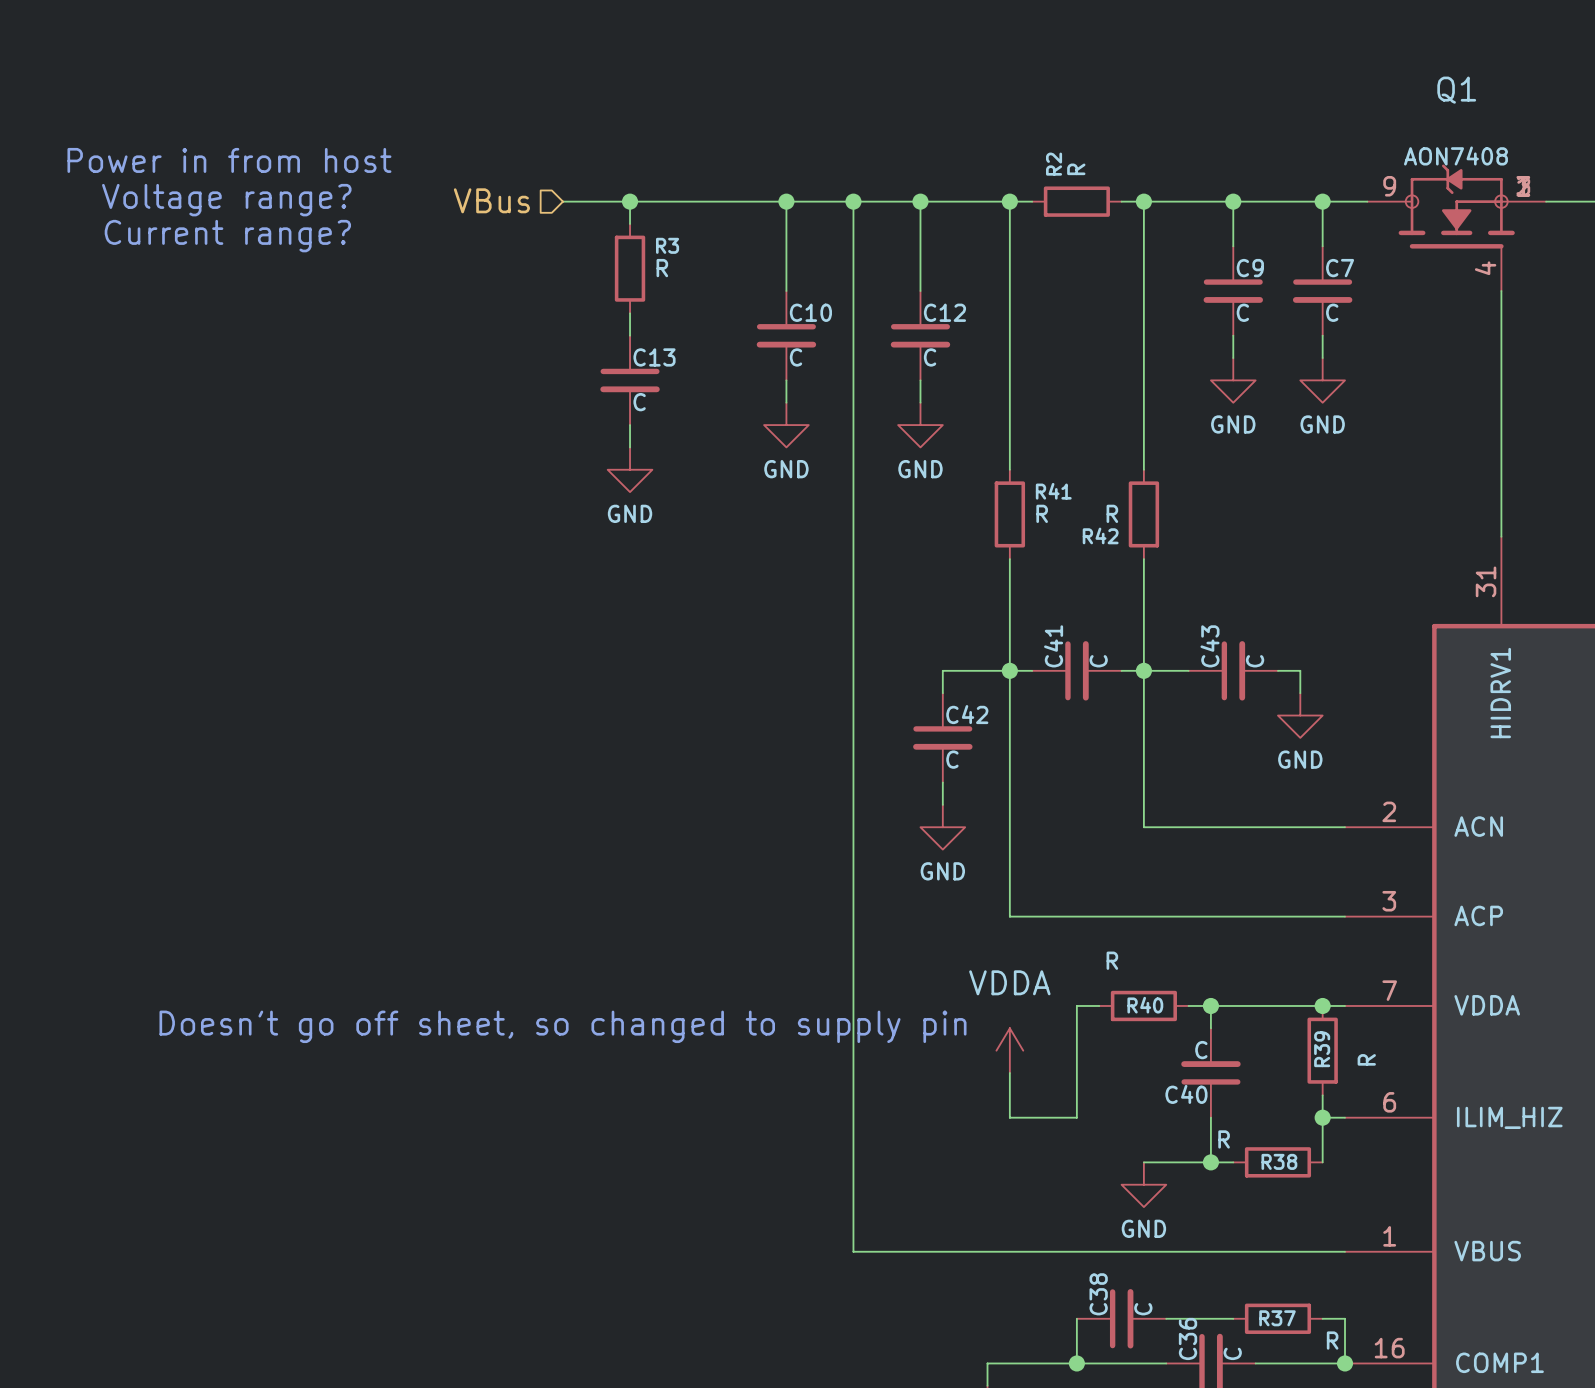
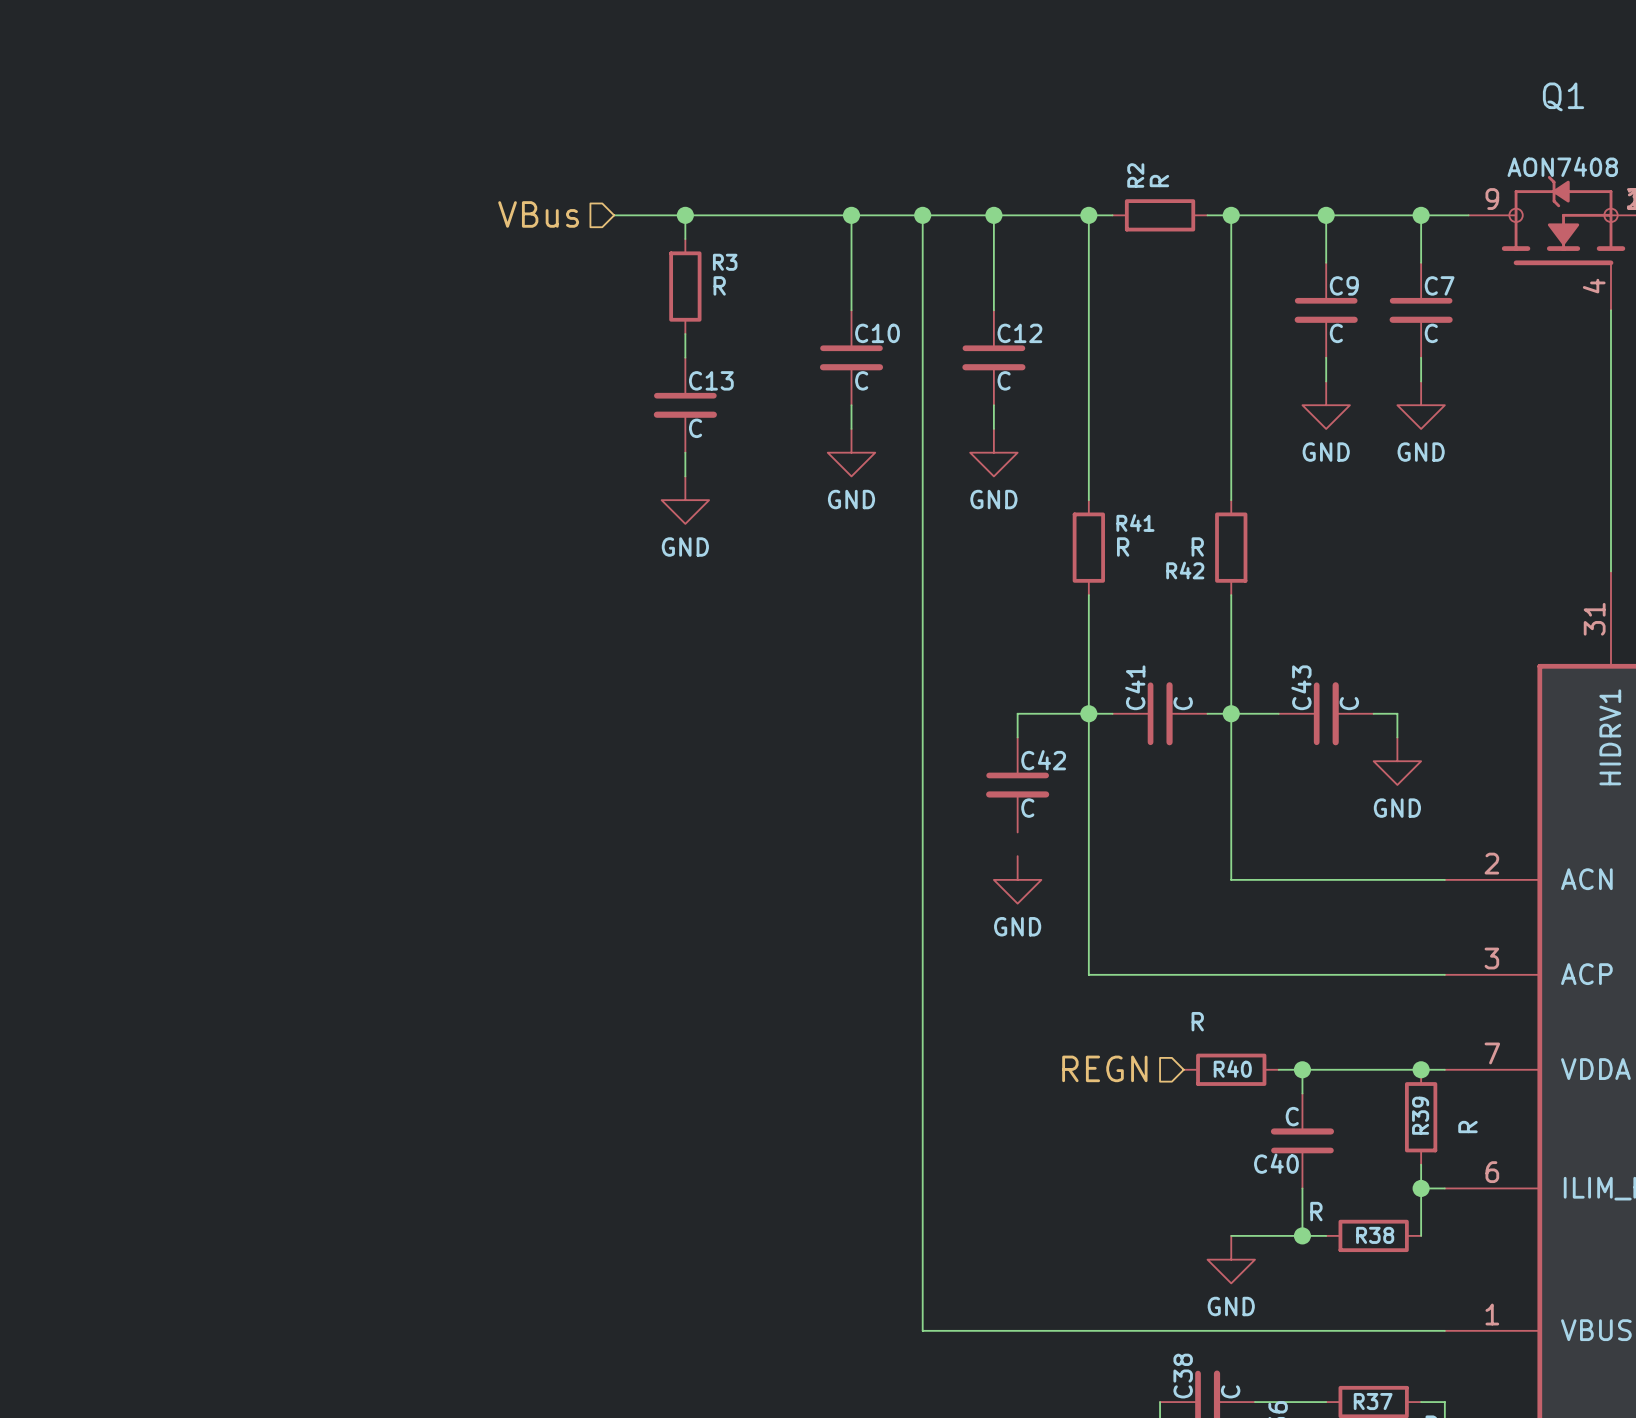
text: Power in from host (229, 160) -> none
text: Voltage range? (226, 200) -> none
text: Current range? (227, 236) -> none
wire: (942, 782) (942, 804) -> none
hierarchical label: none -> REGN (1104, 1068)
wire: (1099, 1005) (1076, 1005) (1076, 1117) (1009, 1117) (1009, 1073) -> none
text: Doesn't go off sheet, so changed to supply pin (563, 1026) -> none
power symbol: VDDA (1009, 1050) -> none

